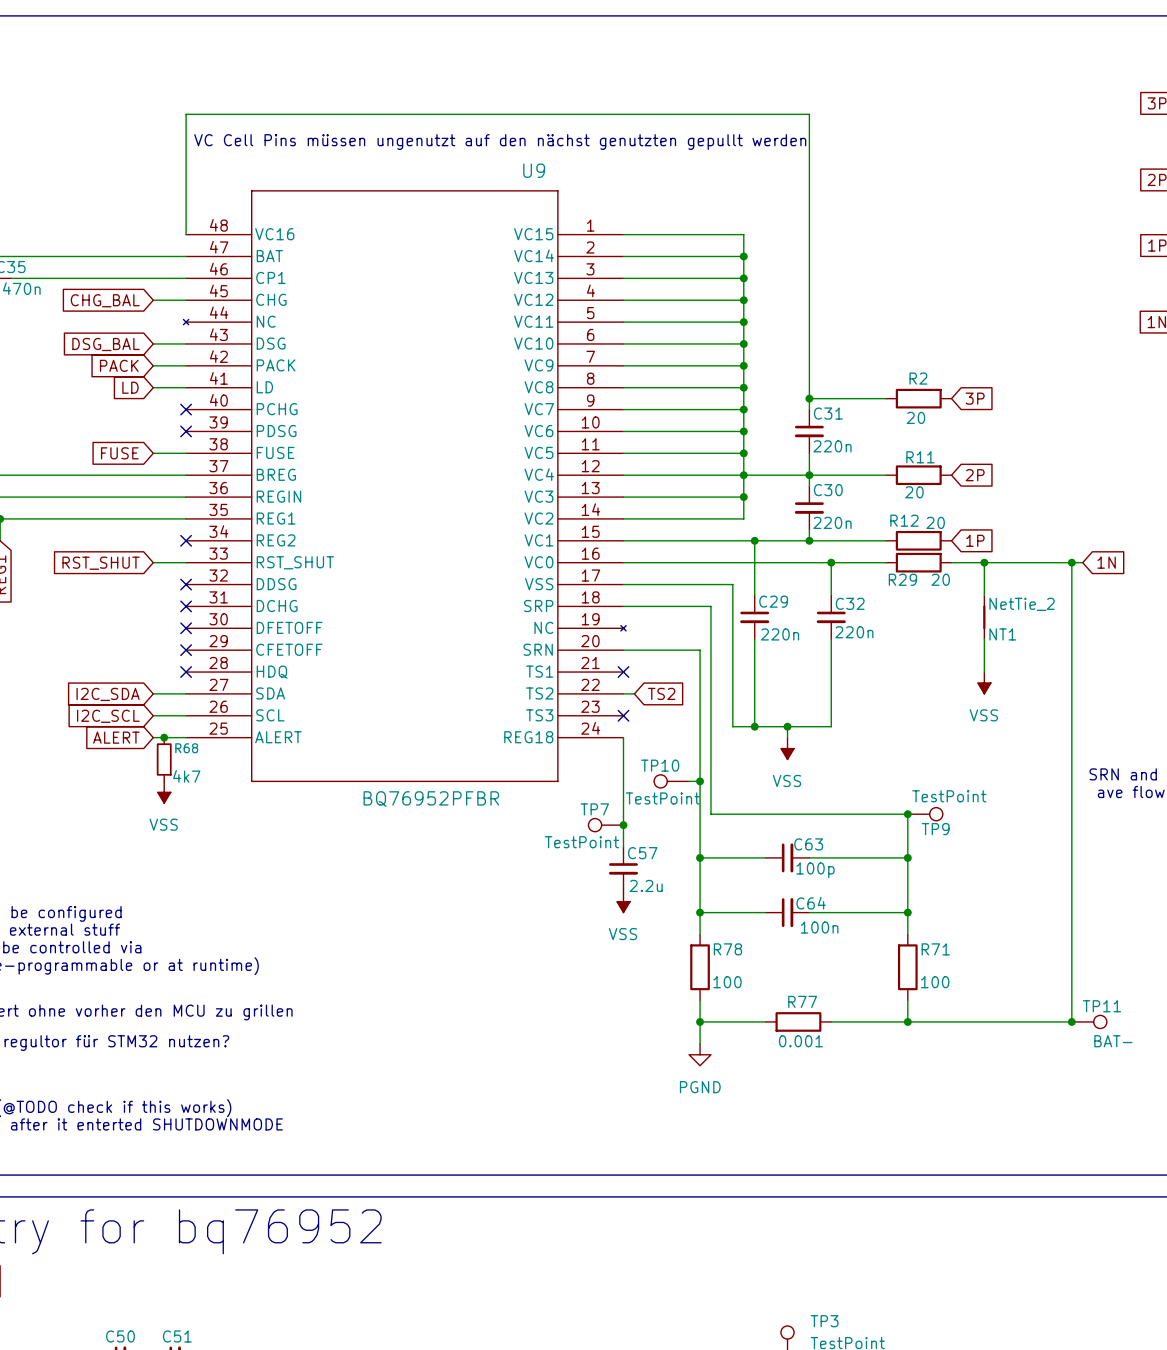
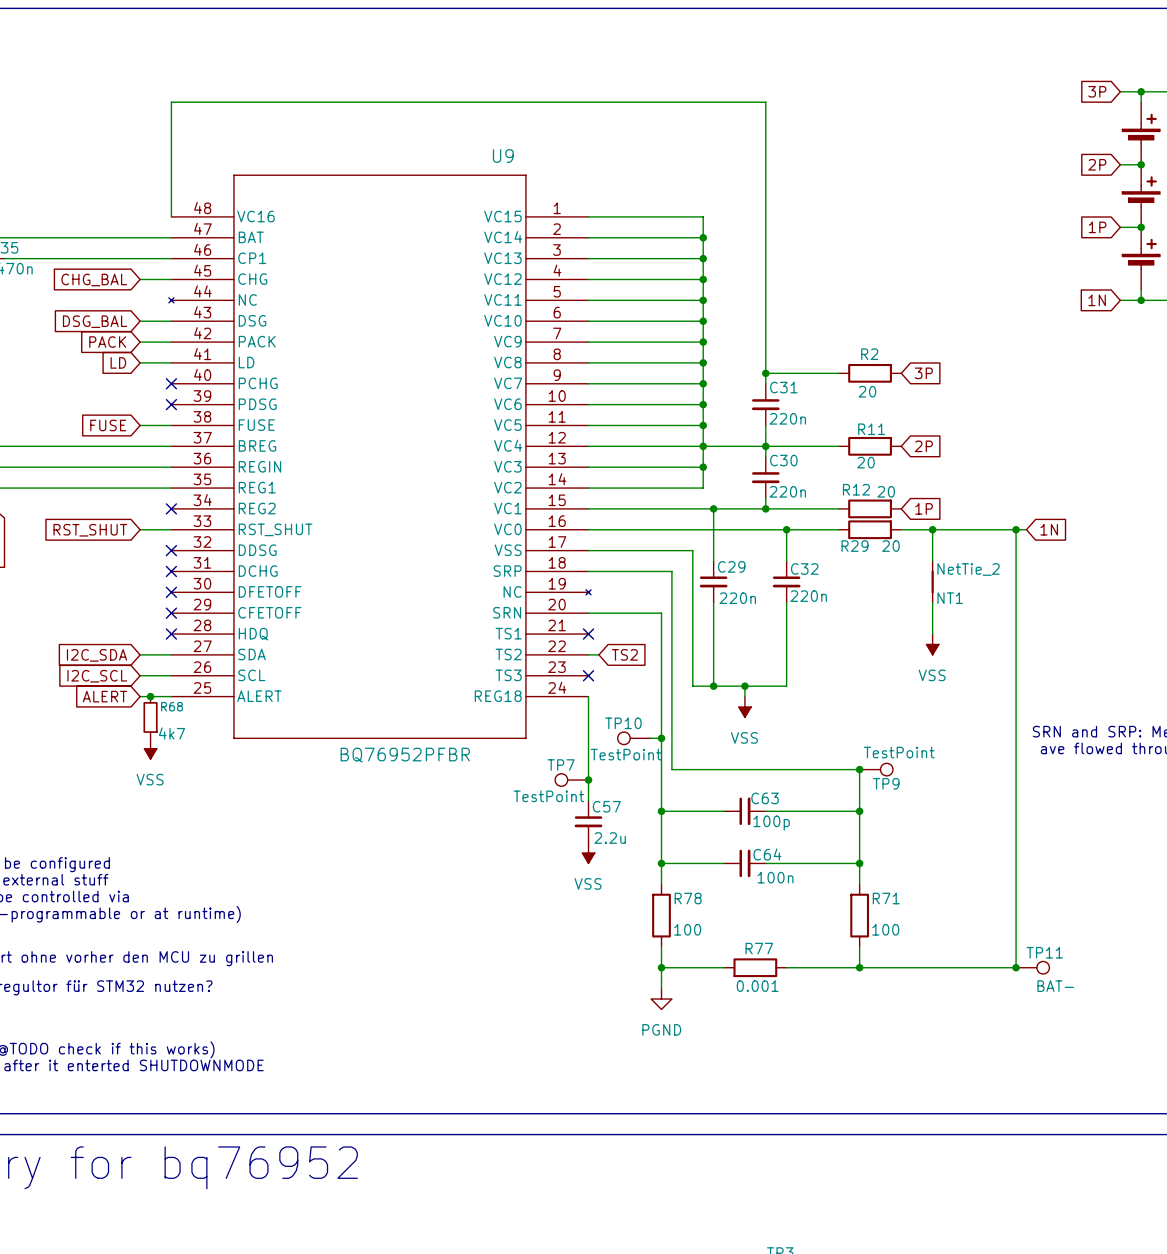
text: VC Cell Pins müssen ungenutzt auf den nächst genutzten gepullt werden (500, 142) -> none

